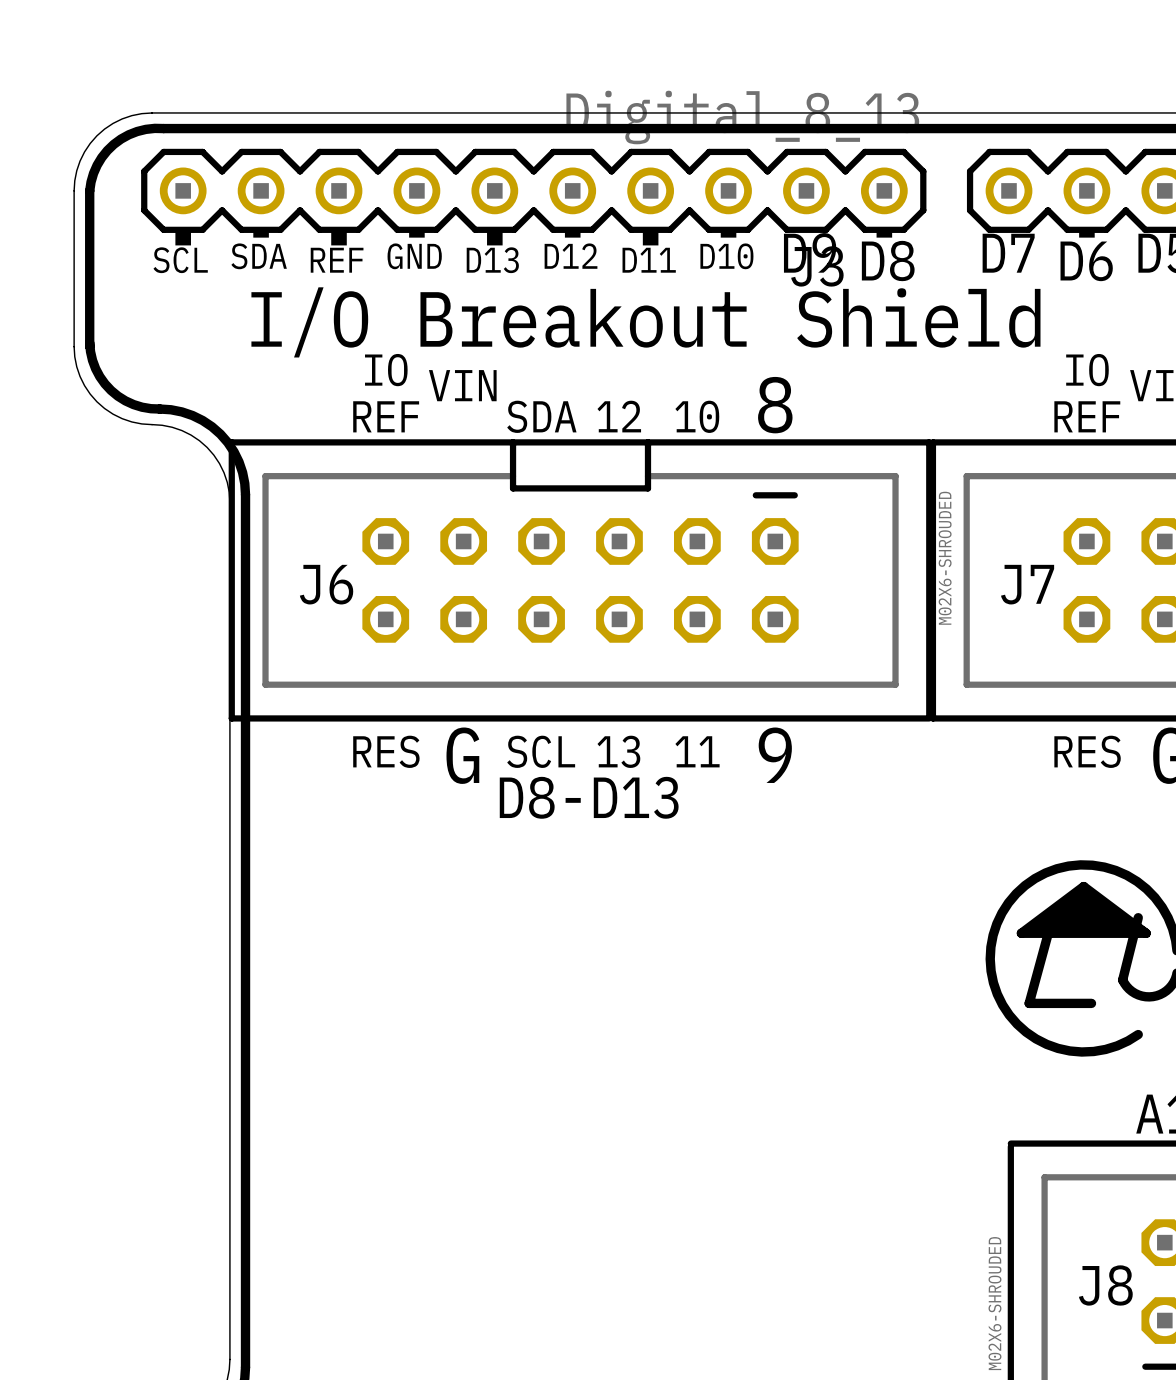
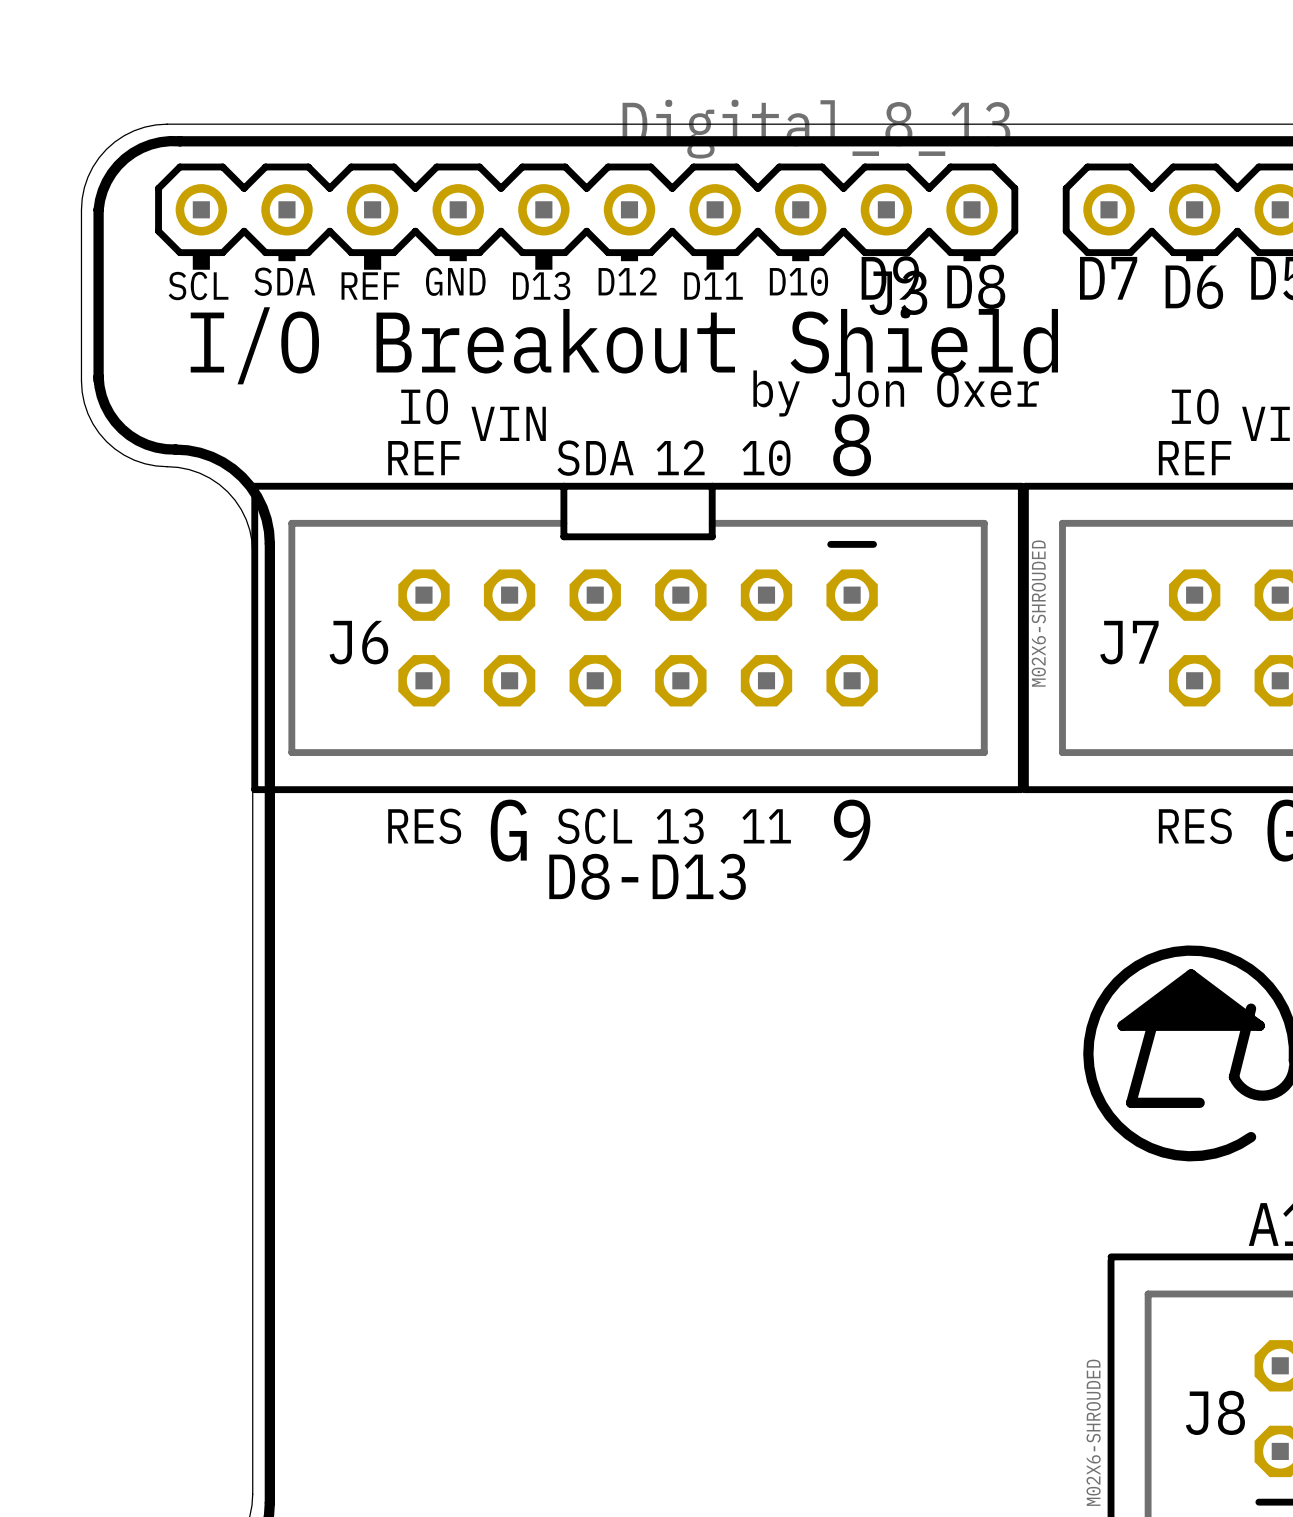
text position: I/O Breakout Shield (645, 322) -> I/O Breakout Shield (624, 345)
text: none -> by Jon Oxer (896, 393)

